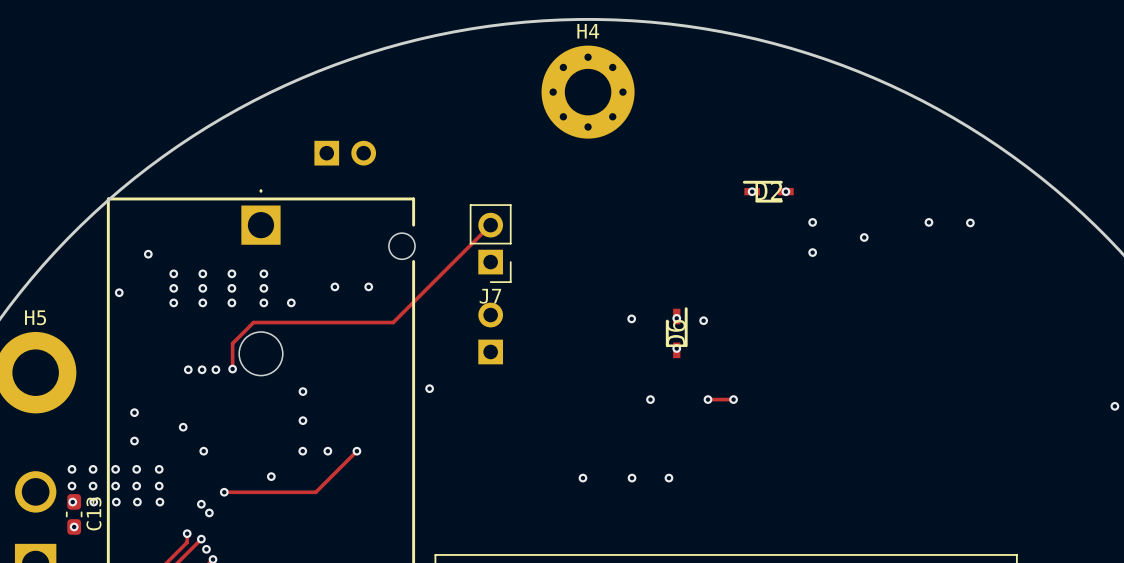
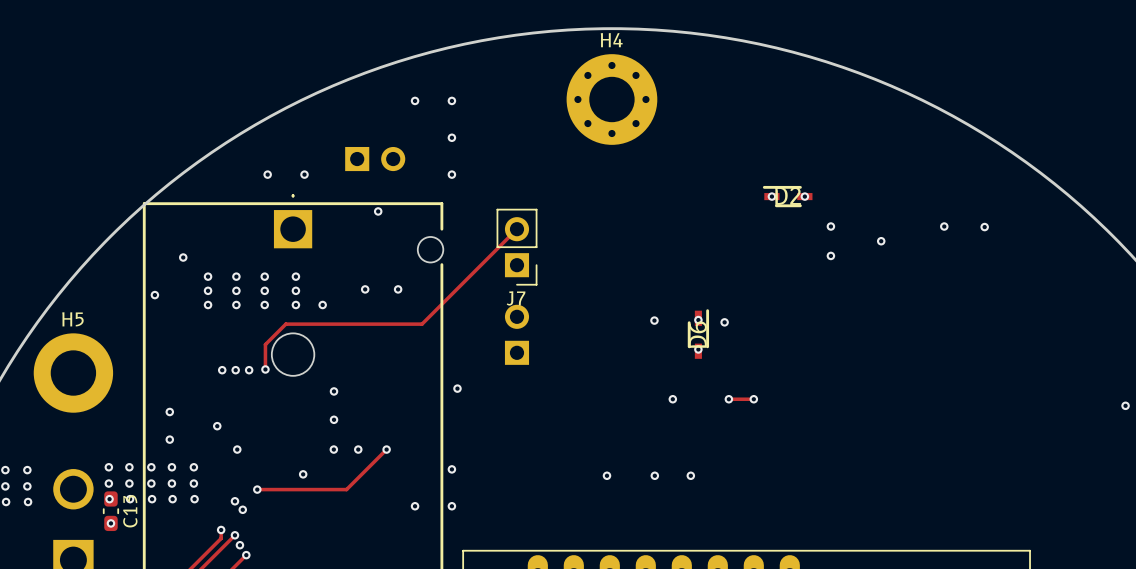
via: none -> (415, 100)
via: none -> (451, 100)
via: none -> (451, 137)
via: none -> (267, 174)
via: none -> (304, 174)
via: none -> (451, 174)
via: none -> (378, 211)
via: none -> (451, 469)
via: none -> (415, 506)
via: none -> (451, 506)

